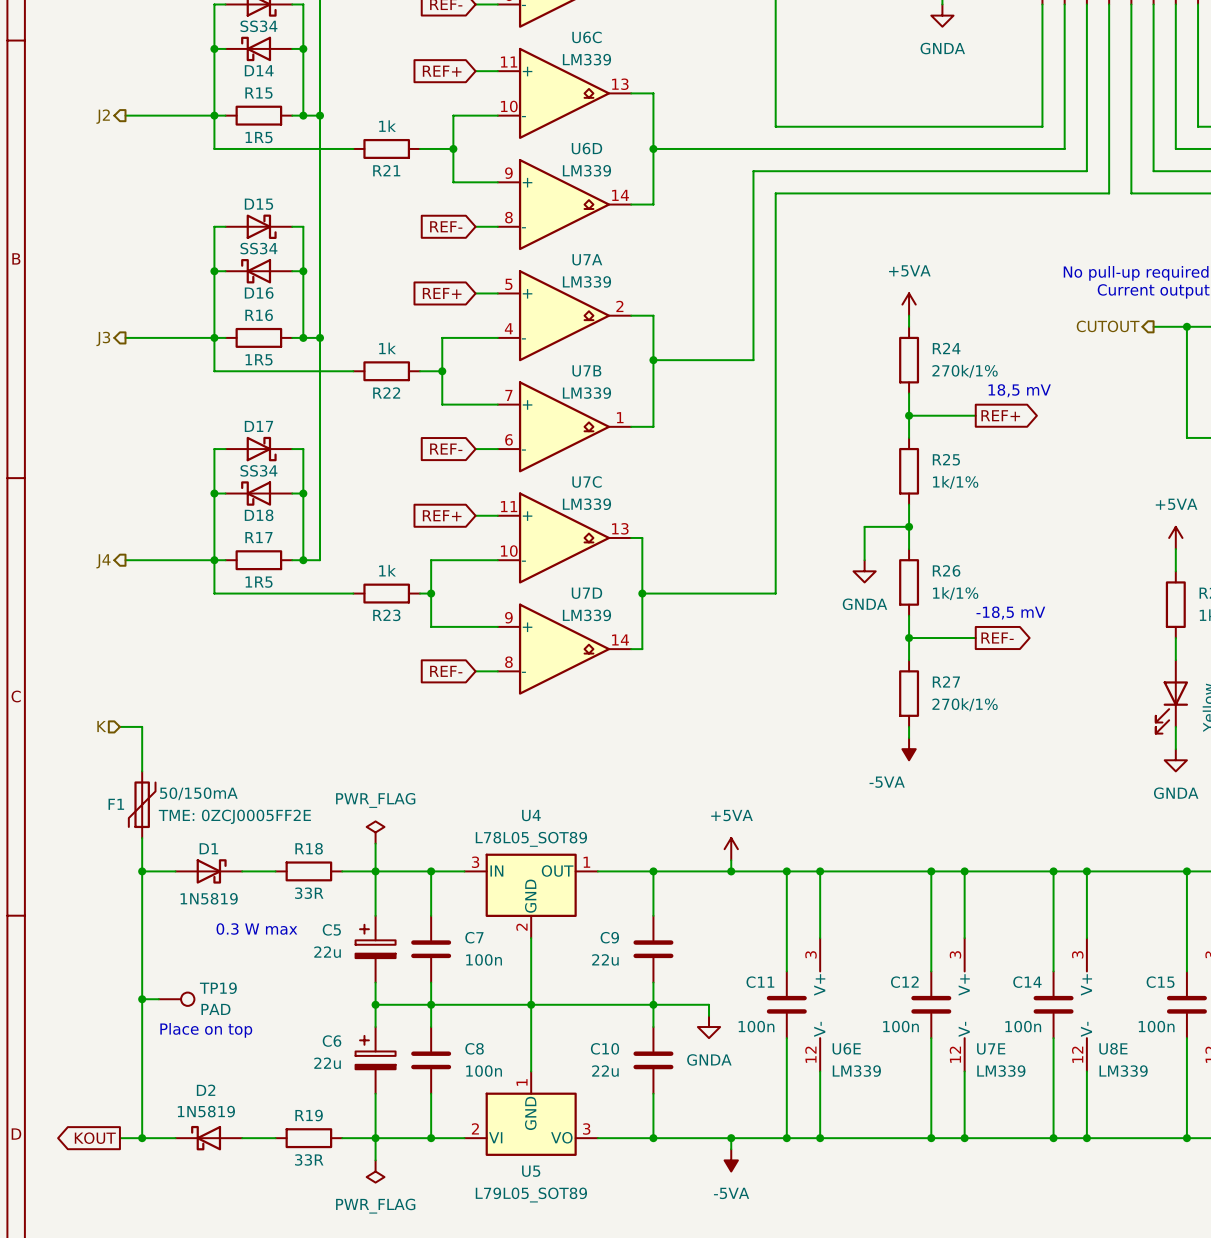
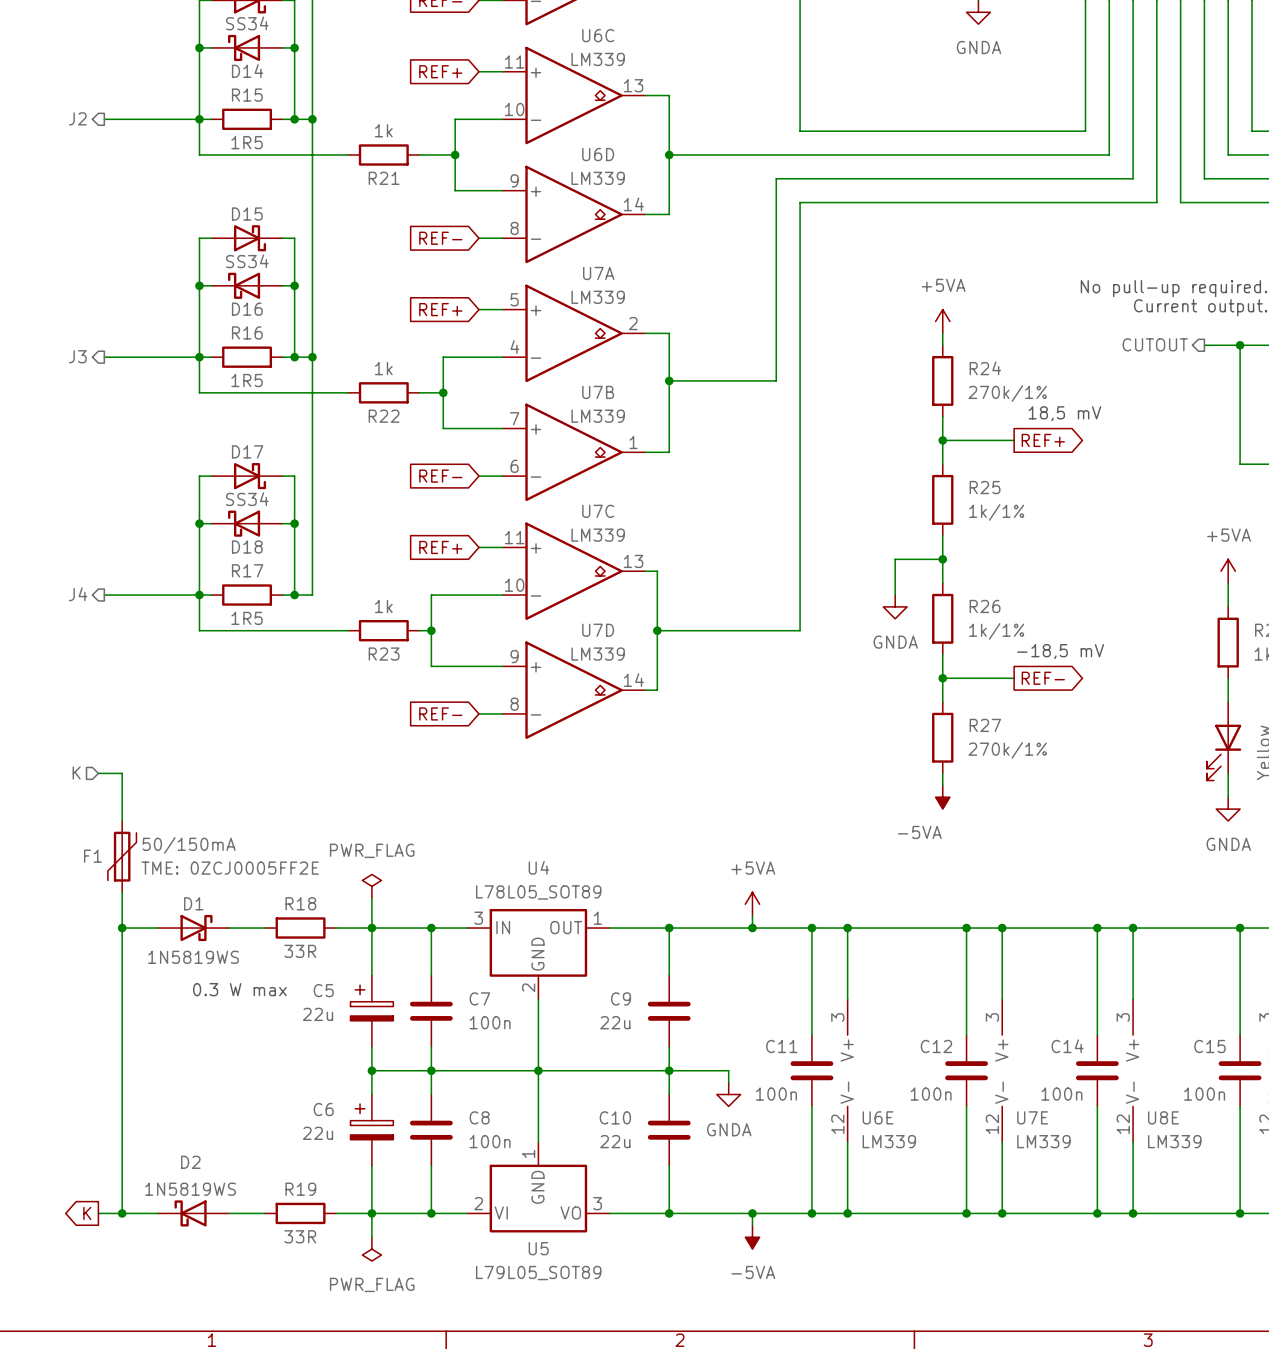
D1 value: 1N5819 (209, 898) -> 1N5819WS (193, 957)
wire: (142, 999) (158, 999) -> none
junction: (142, 999) -> none
TP19: PAD (176, 999) -> none
text: Place on top (206, 1030) -> none
D2 value: 1N5819 (206, 1111) -> 1N5819WS (190, 1189)
global label: KOUT (95, 1138) -> K (87, 1213)

